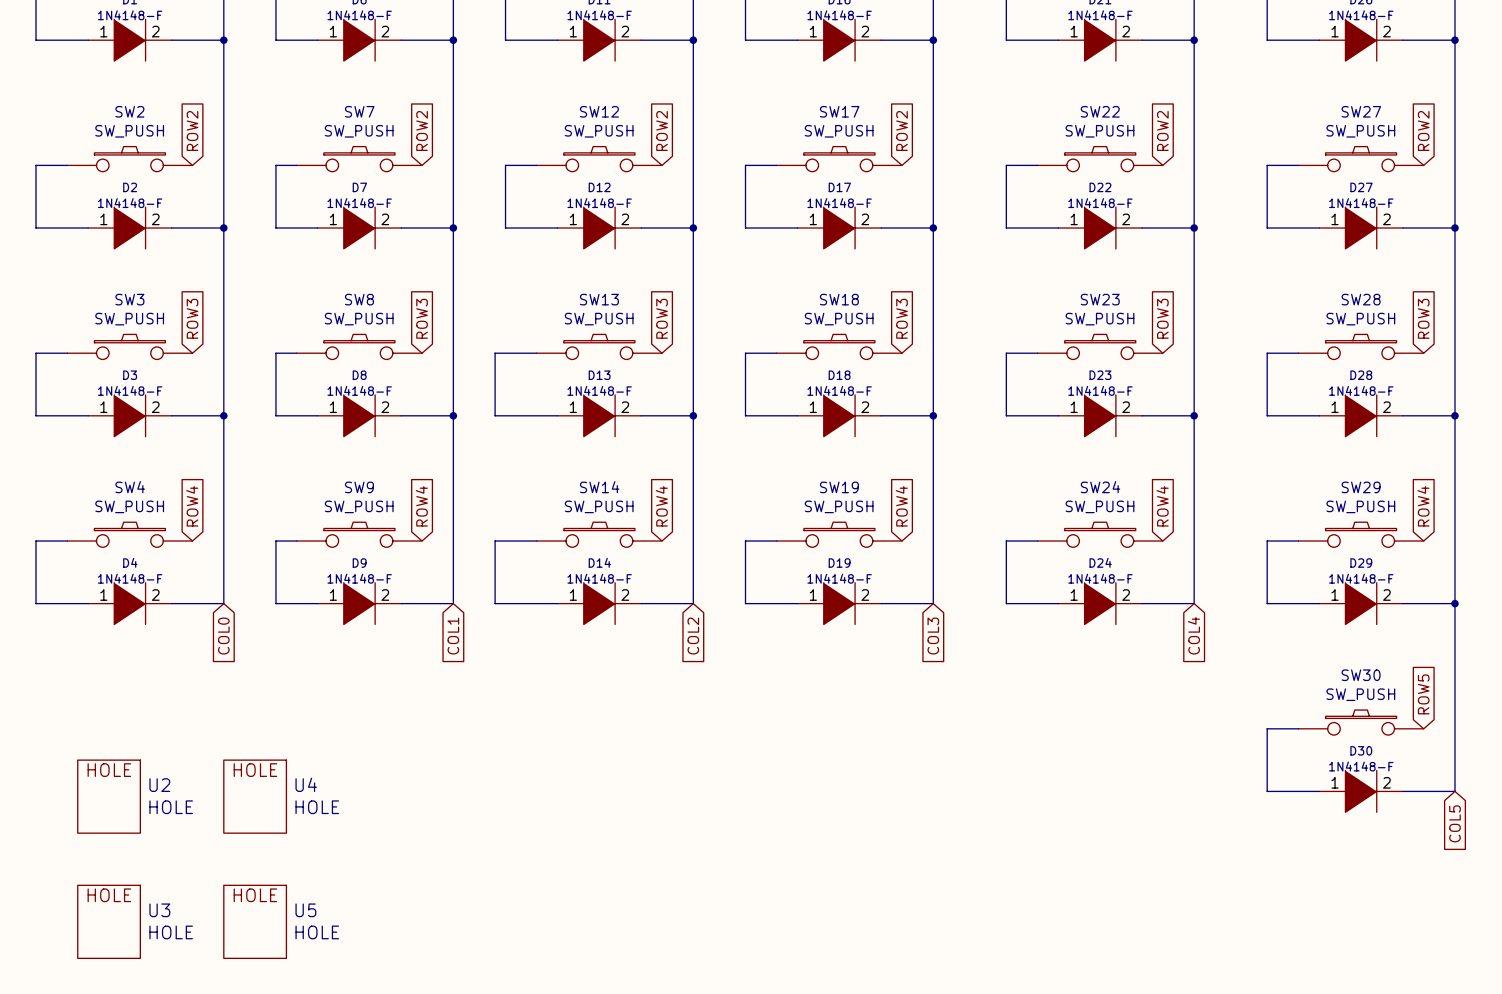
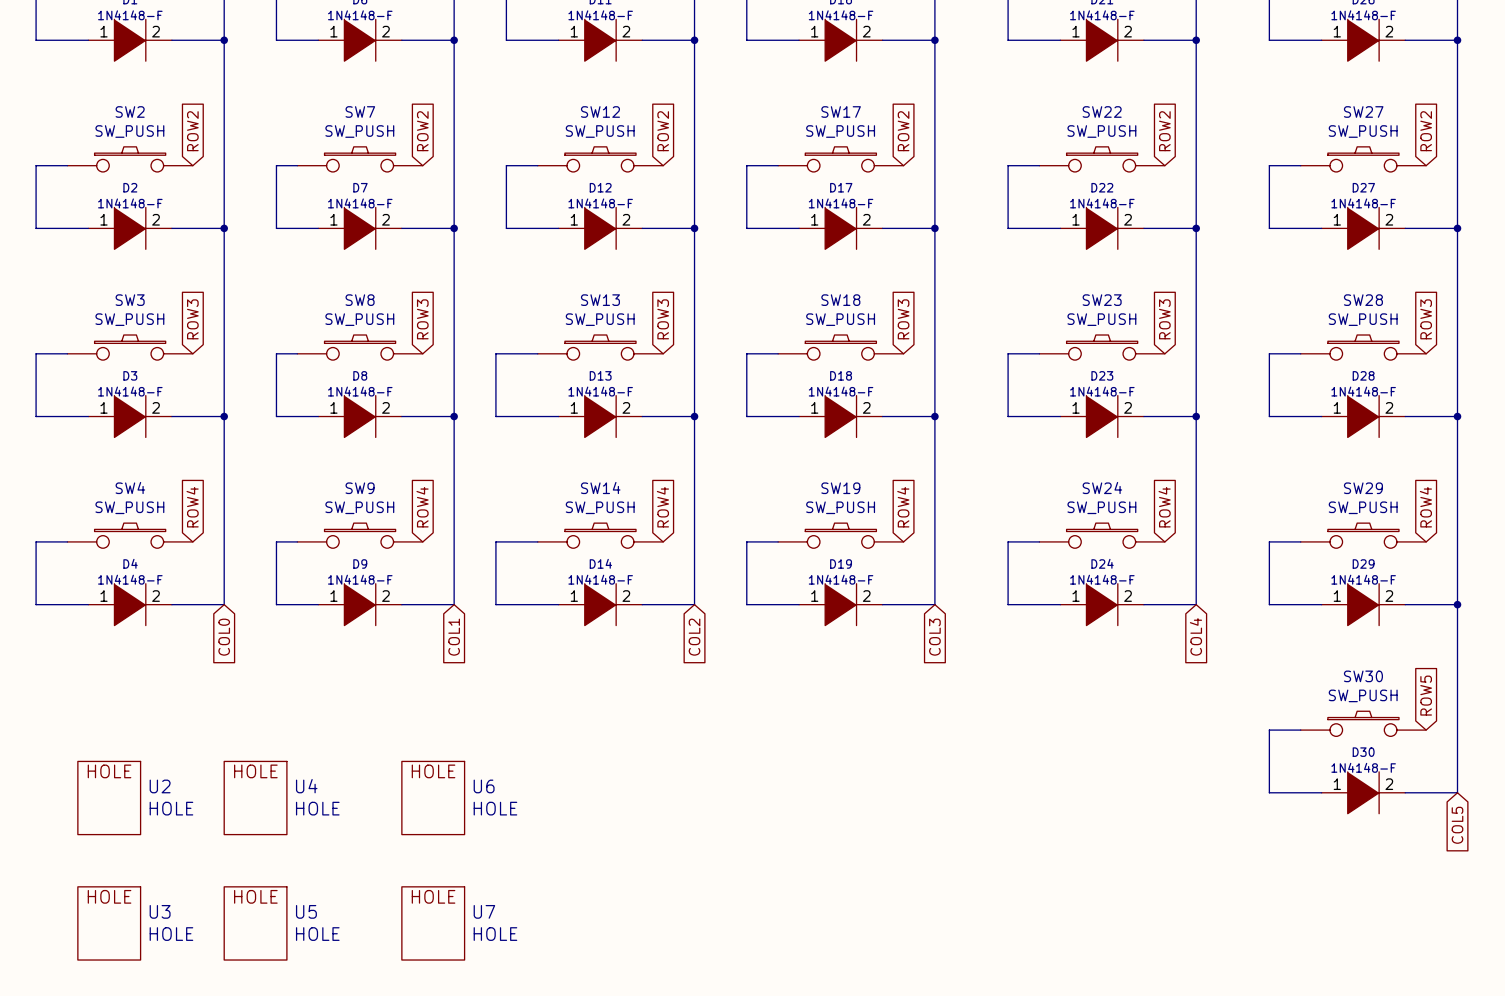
U6: none -> HOLE (433, 798)
U7: none -> HOLE (433, 923)

